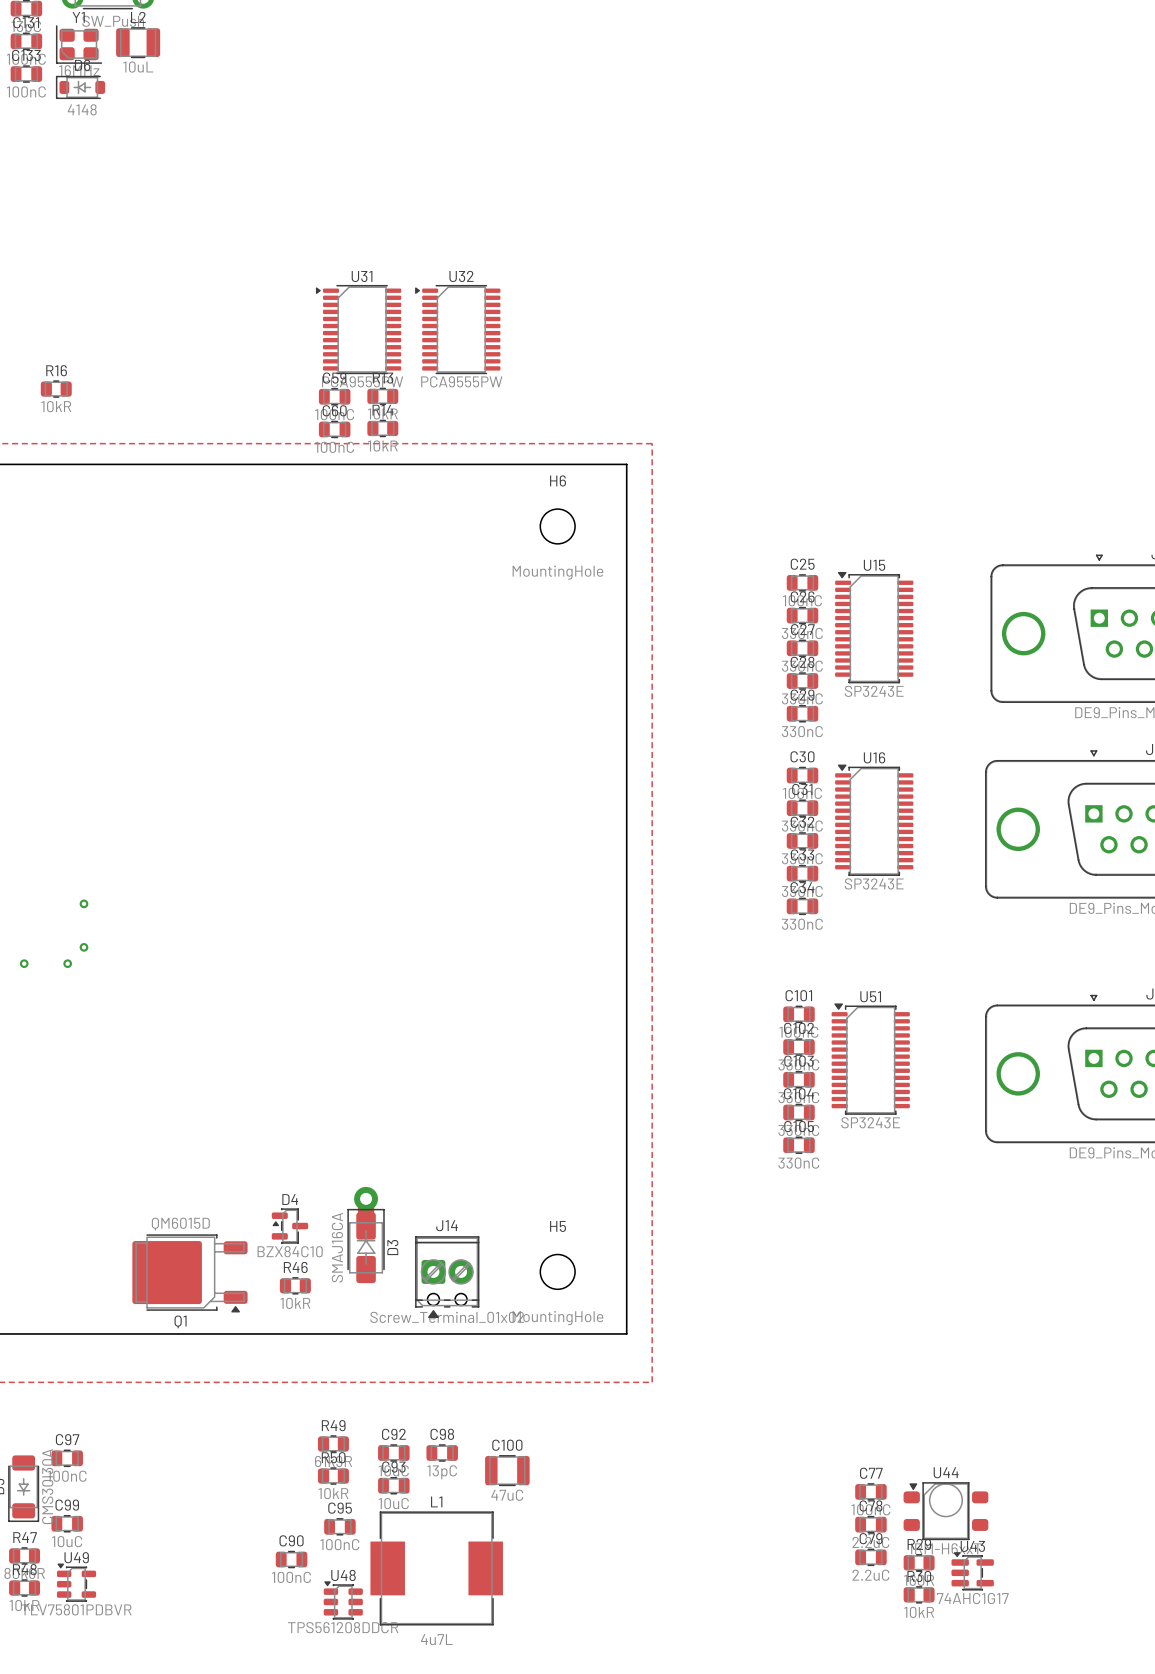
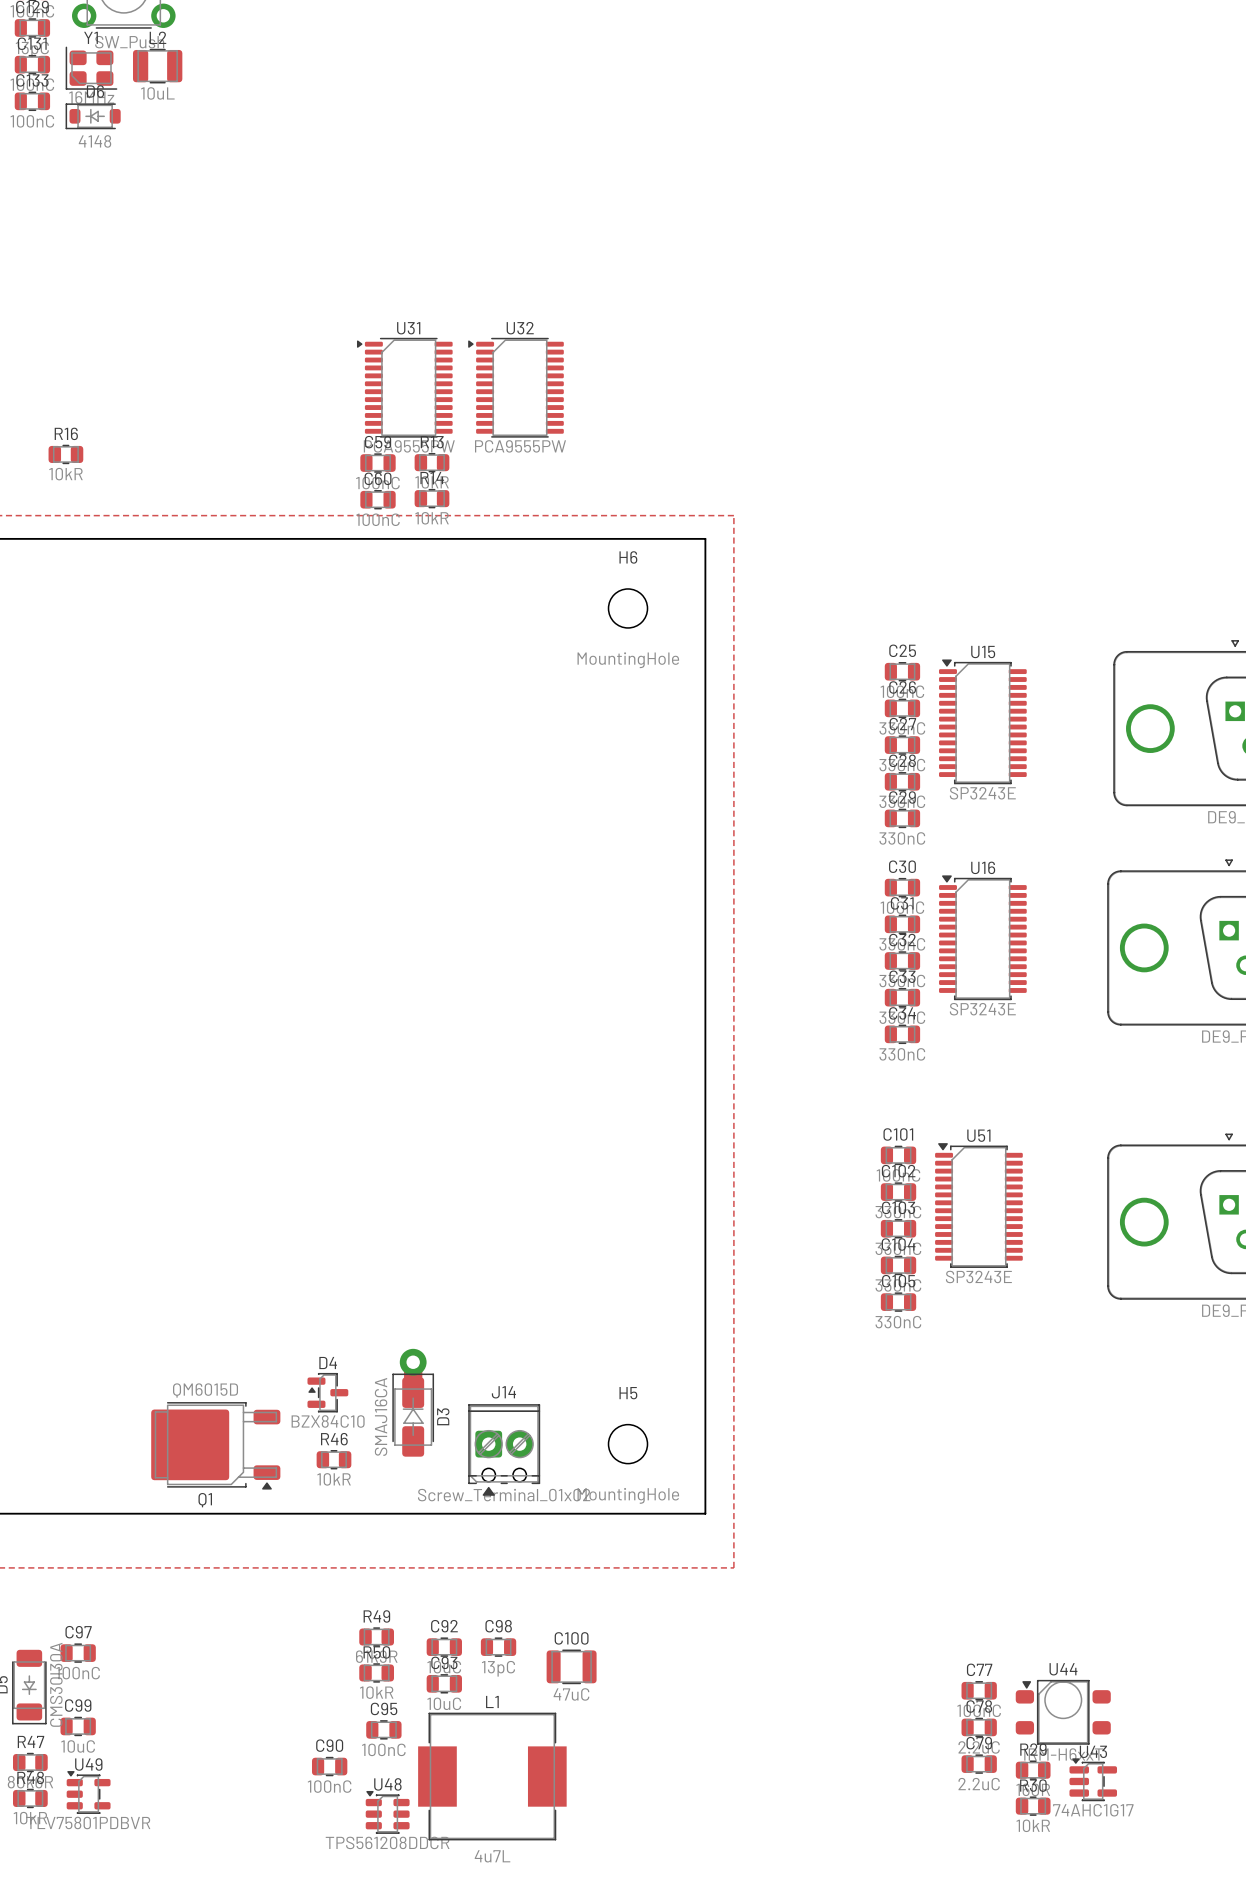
via: (83, 903) -> none
via: (83, 947) -> none
via: (24, 963) -> none
via: (67, 963) -> none

